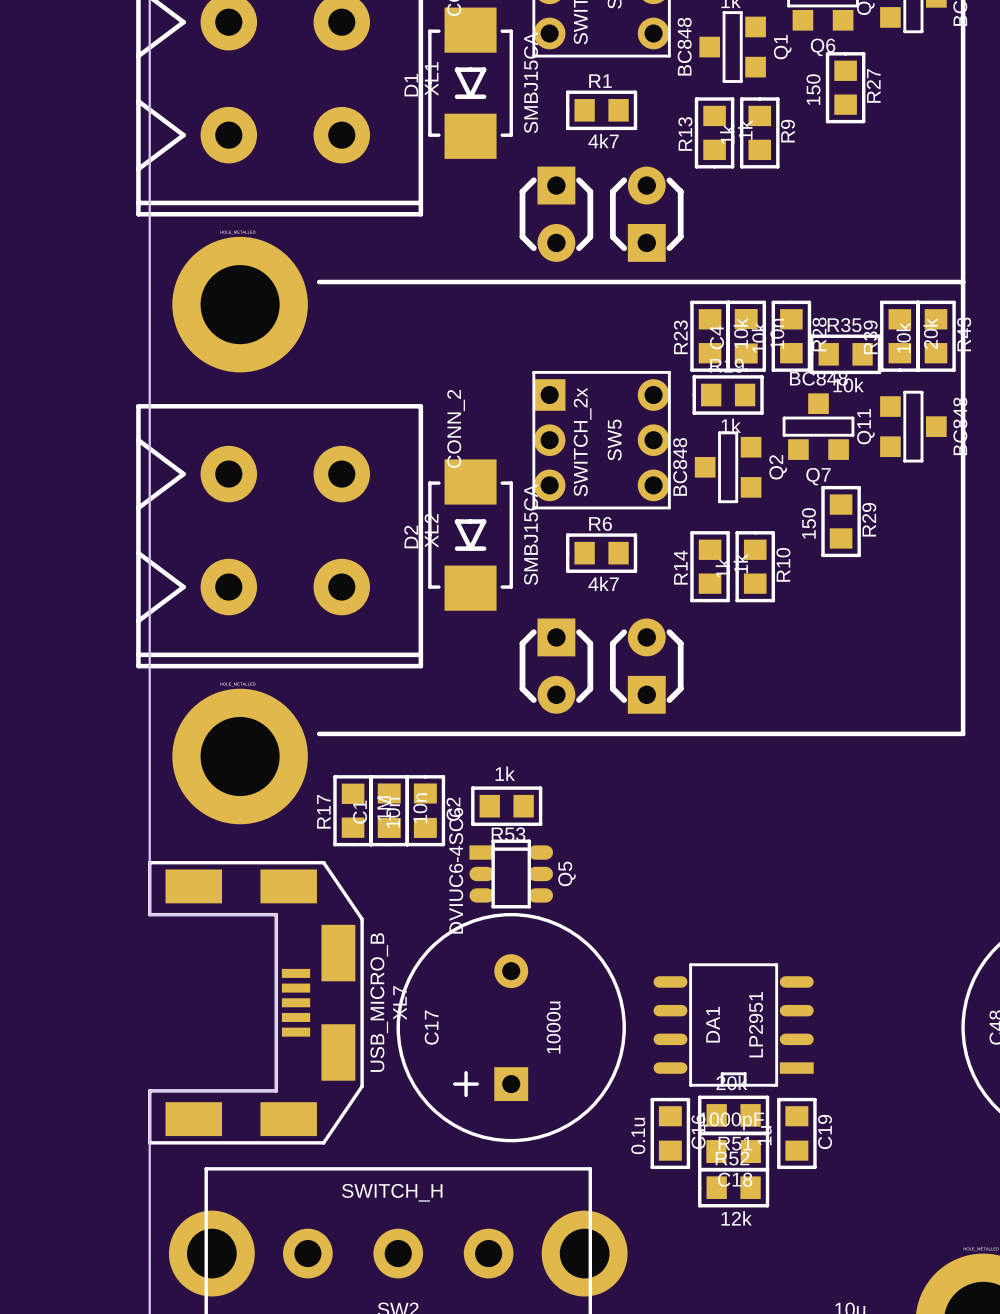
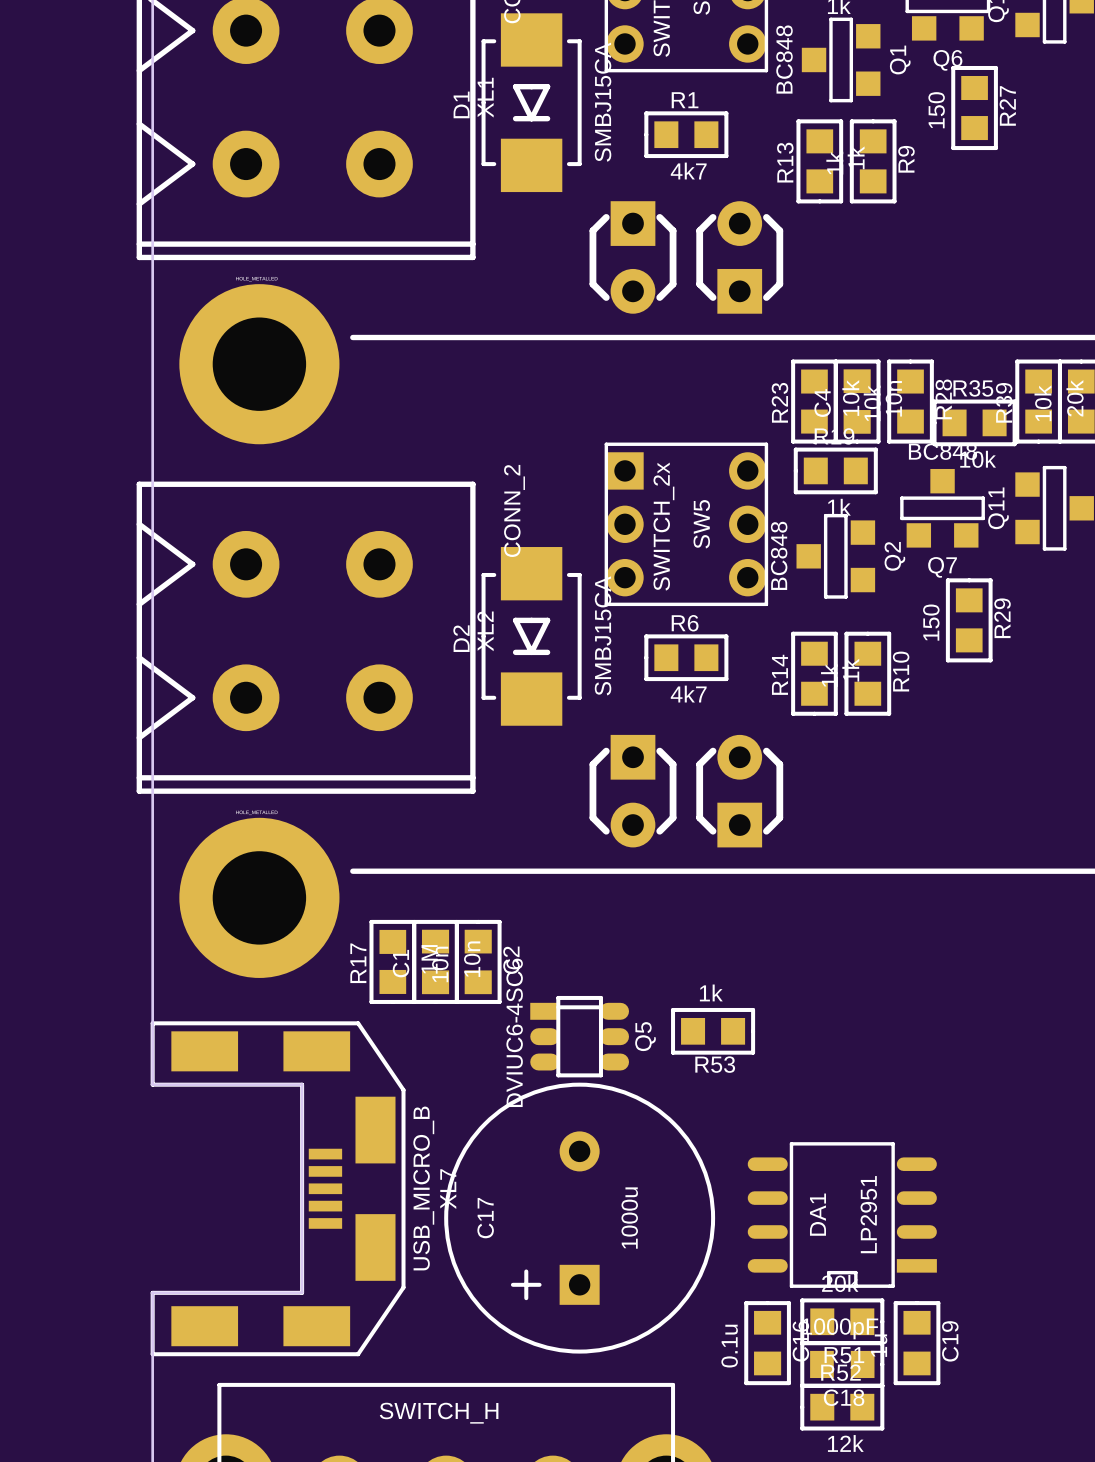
R53 position: (506, 806) -> (713, 1031)

